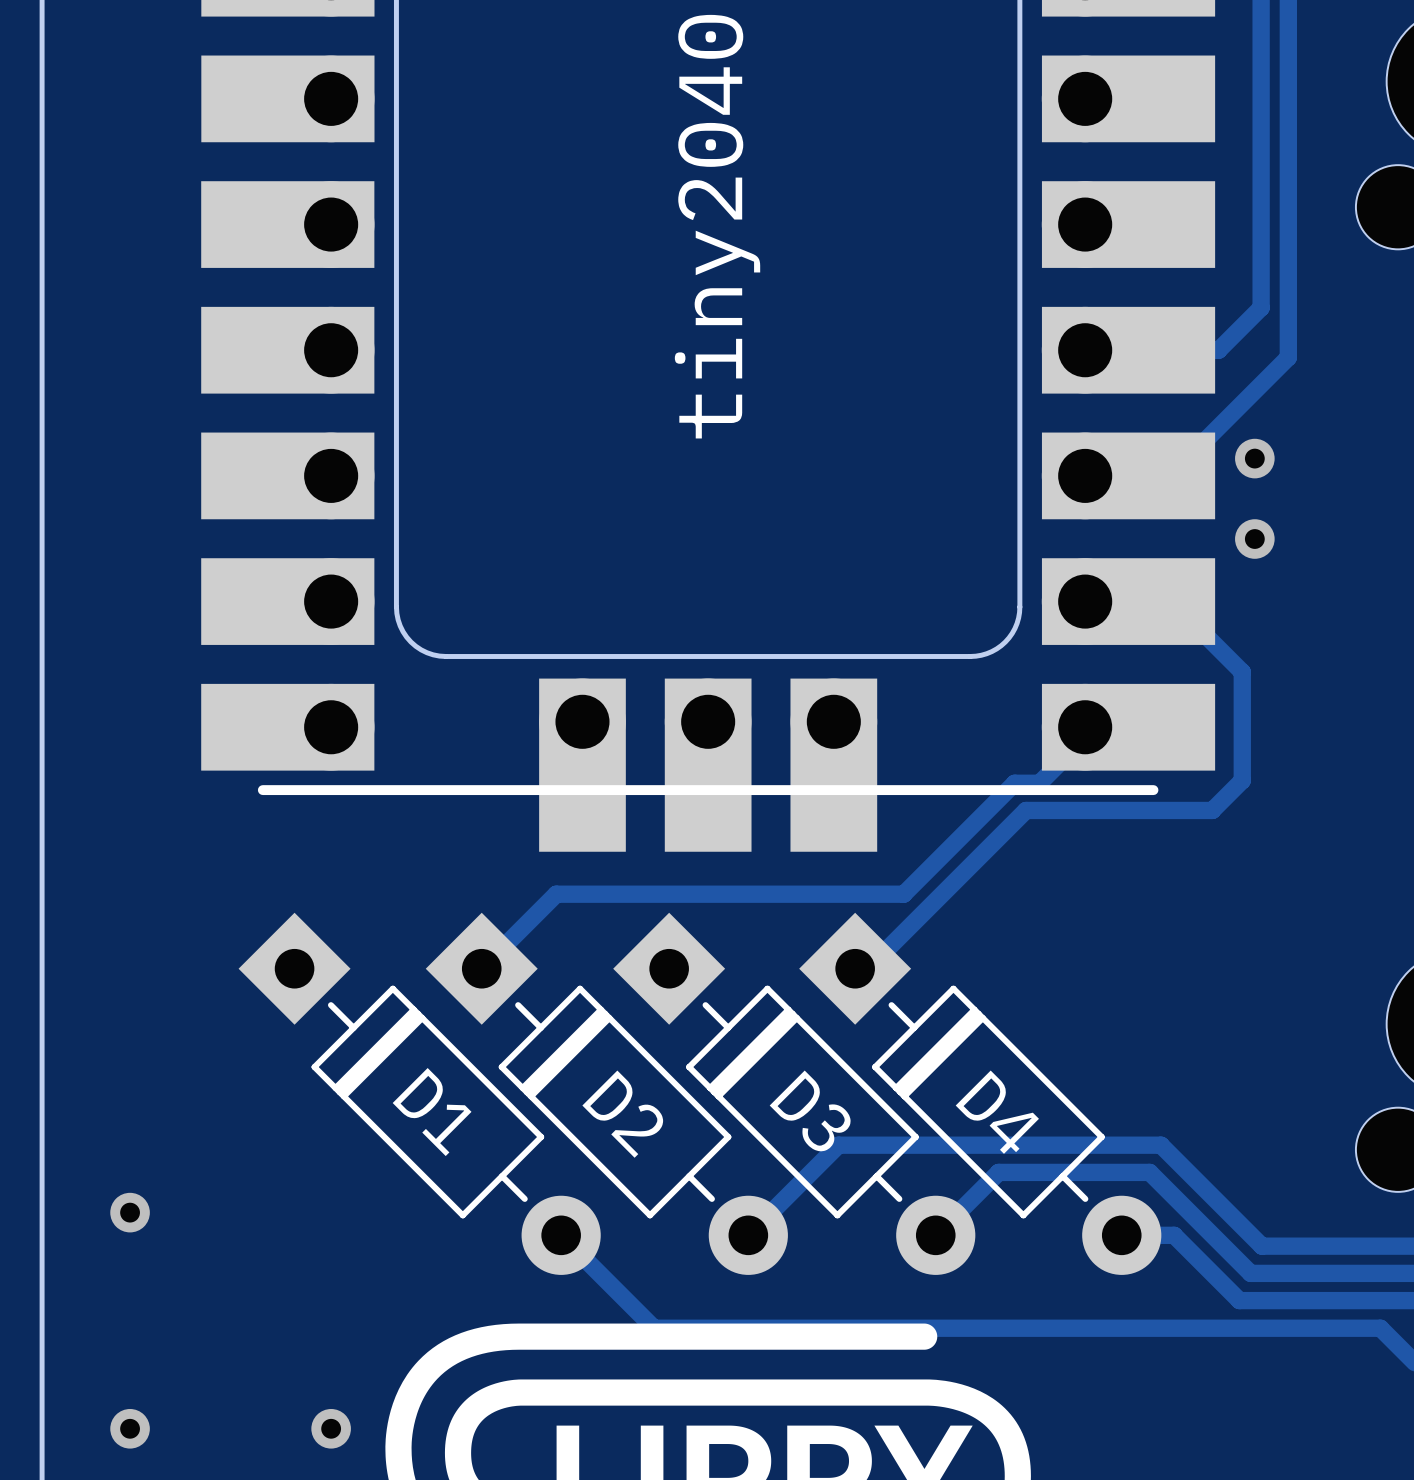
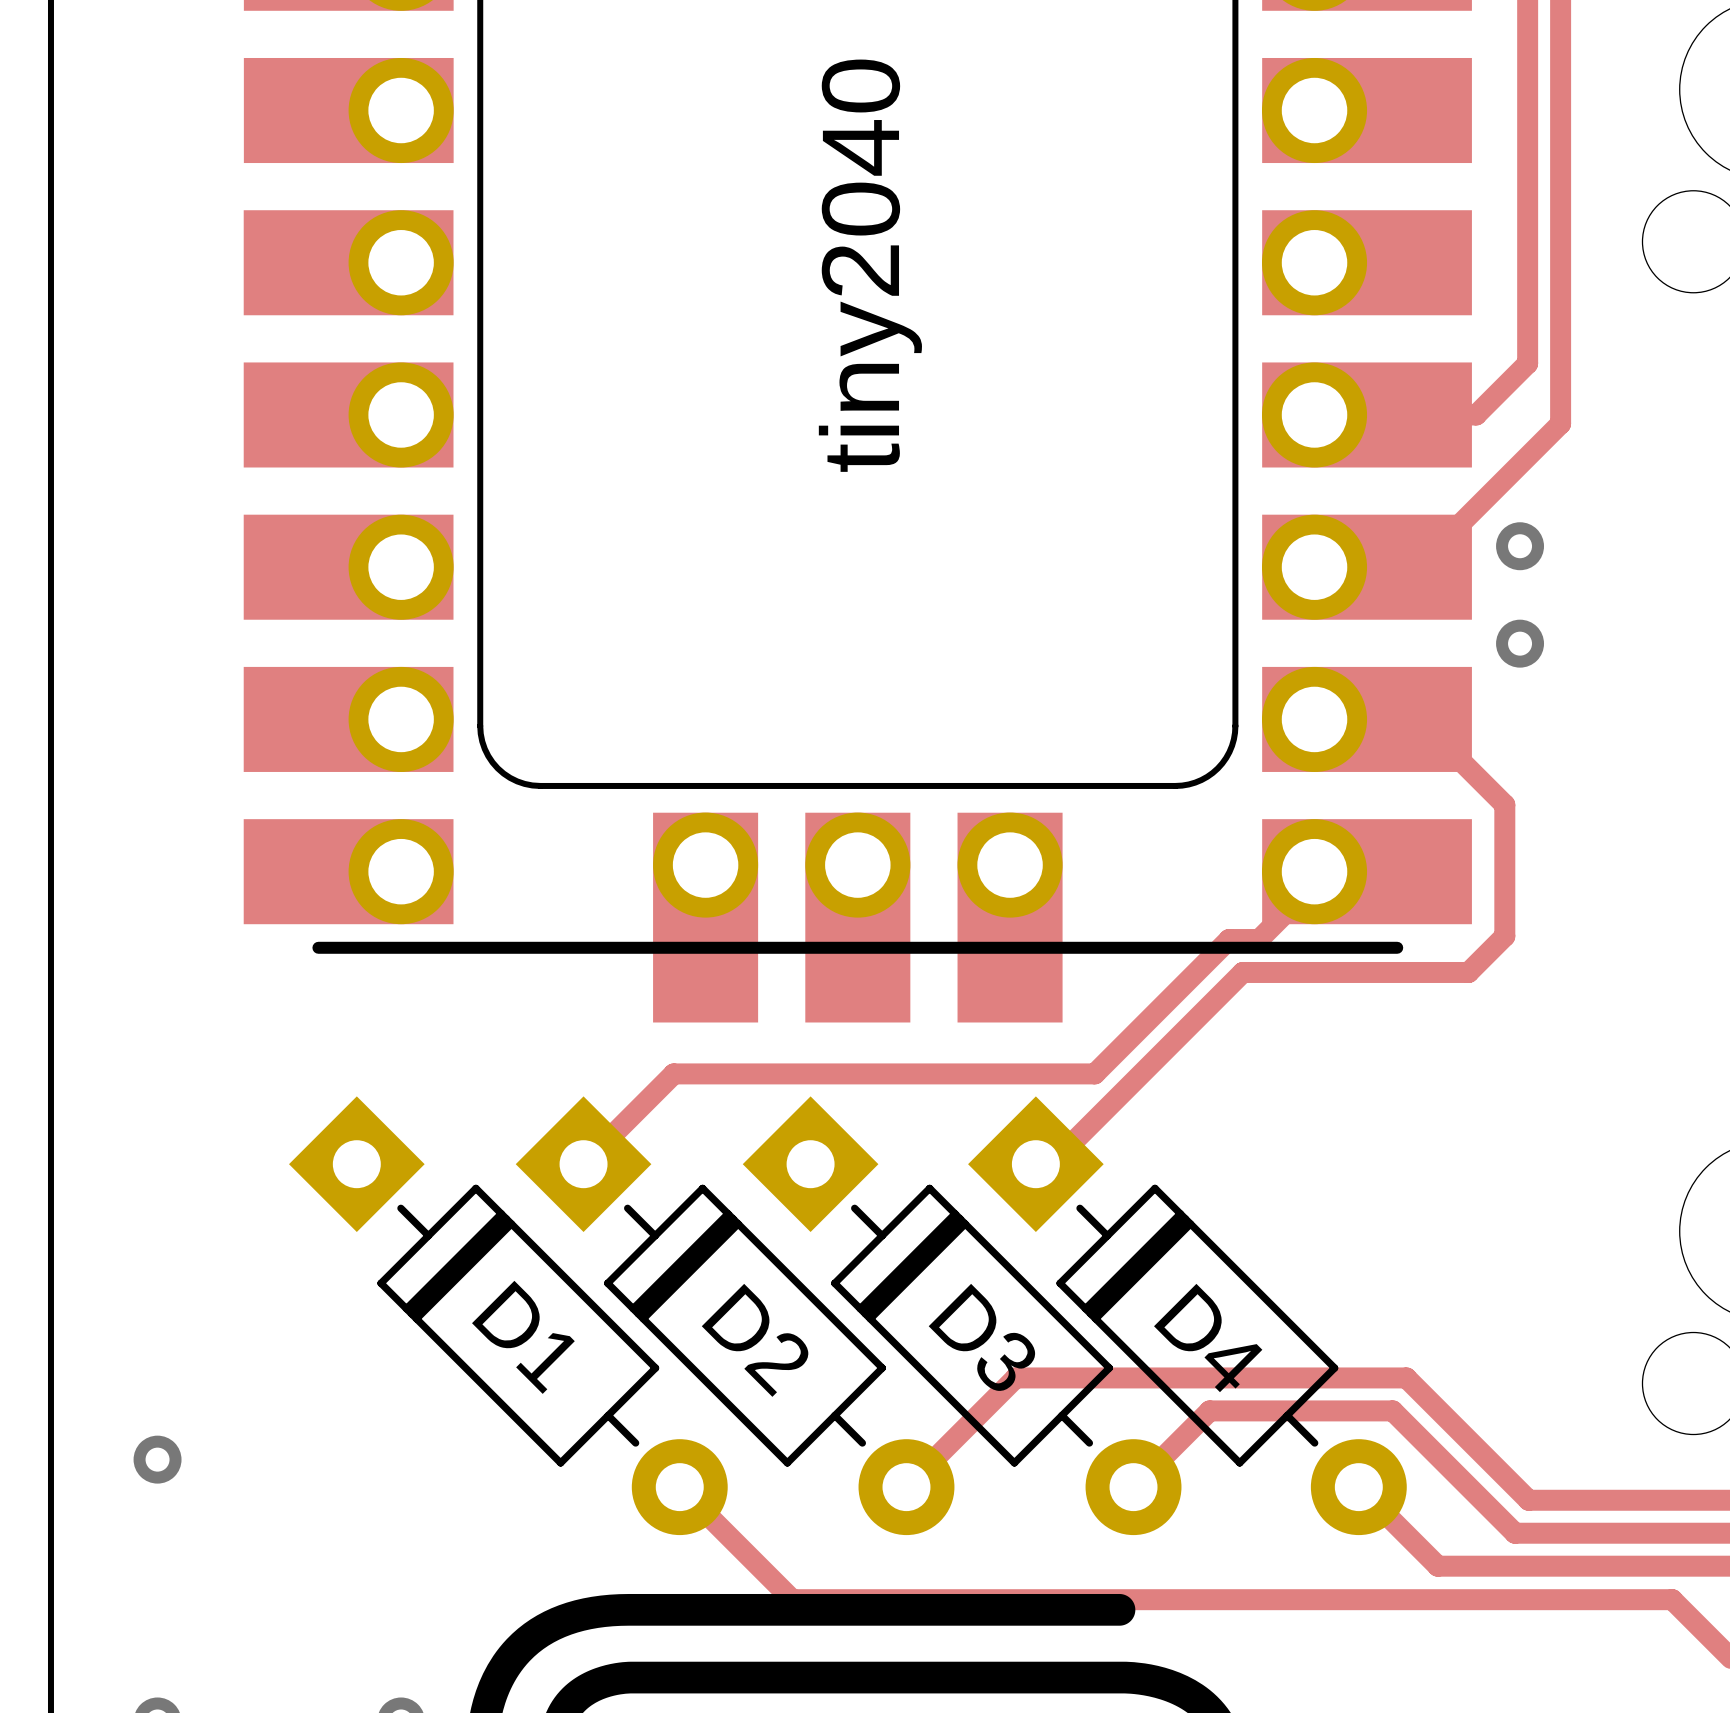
track: (1121, 1235) (1174, 1235) (1239, 1300) -> (1358, 1487) (1437, 1566) (1501, 1566)

